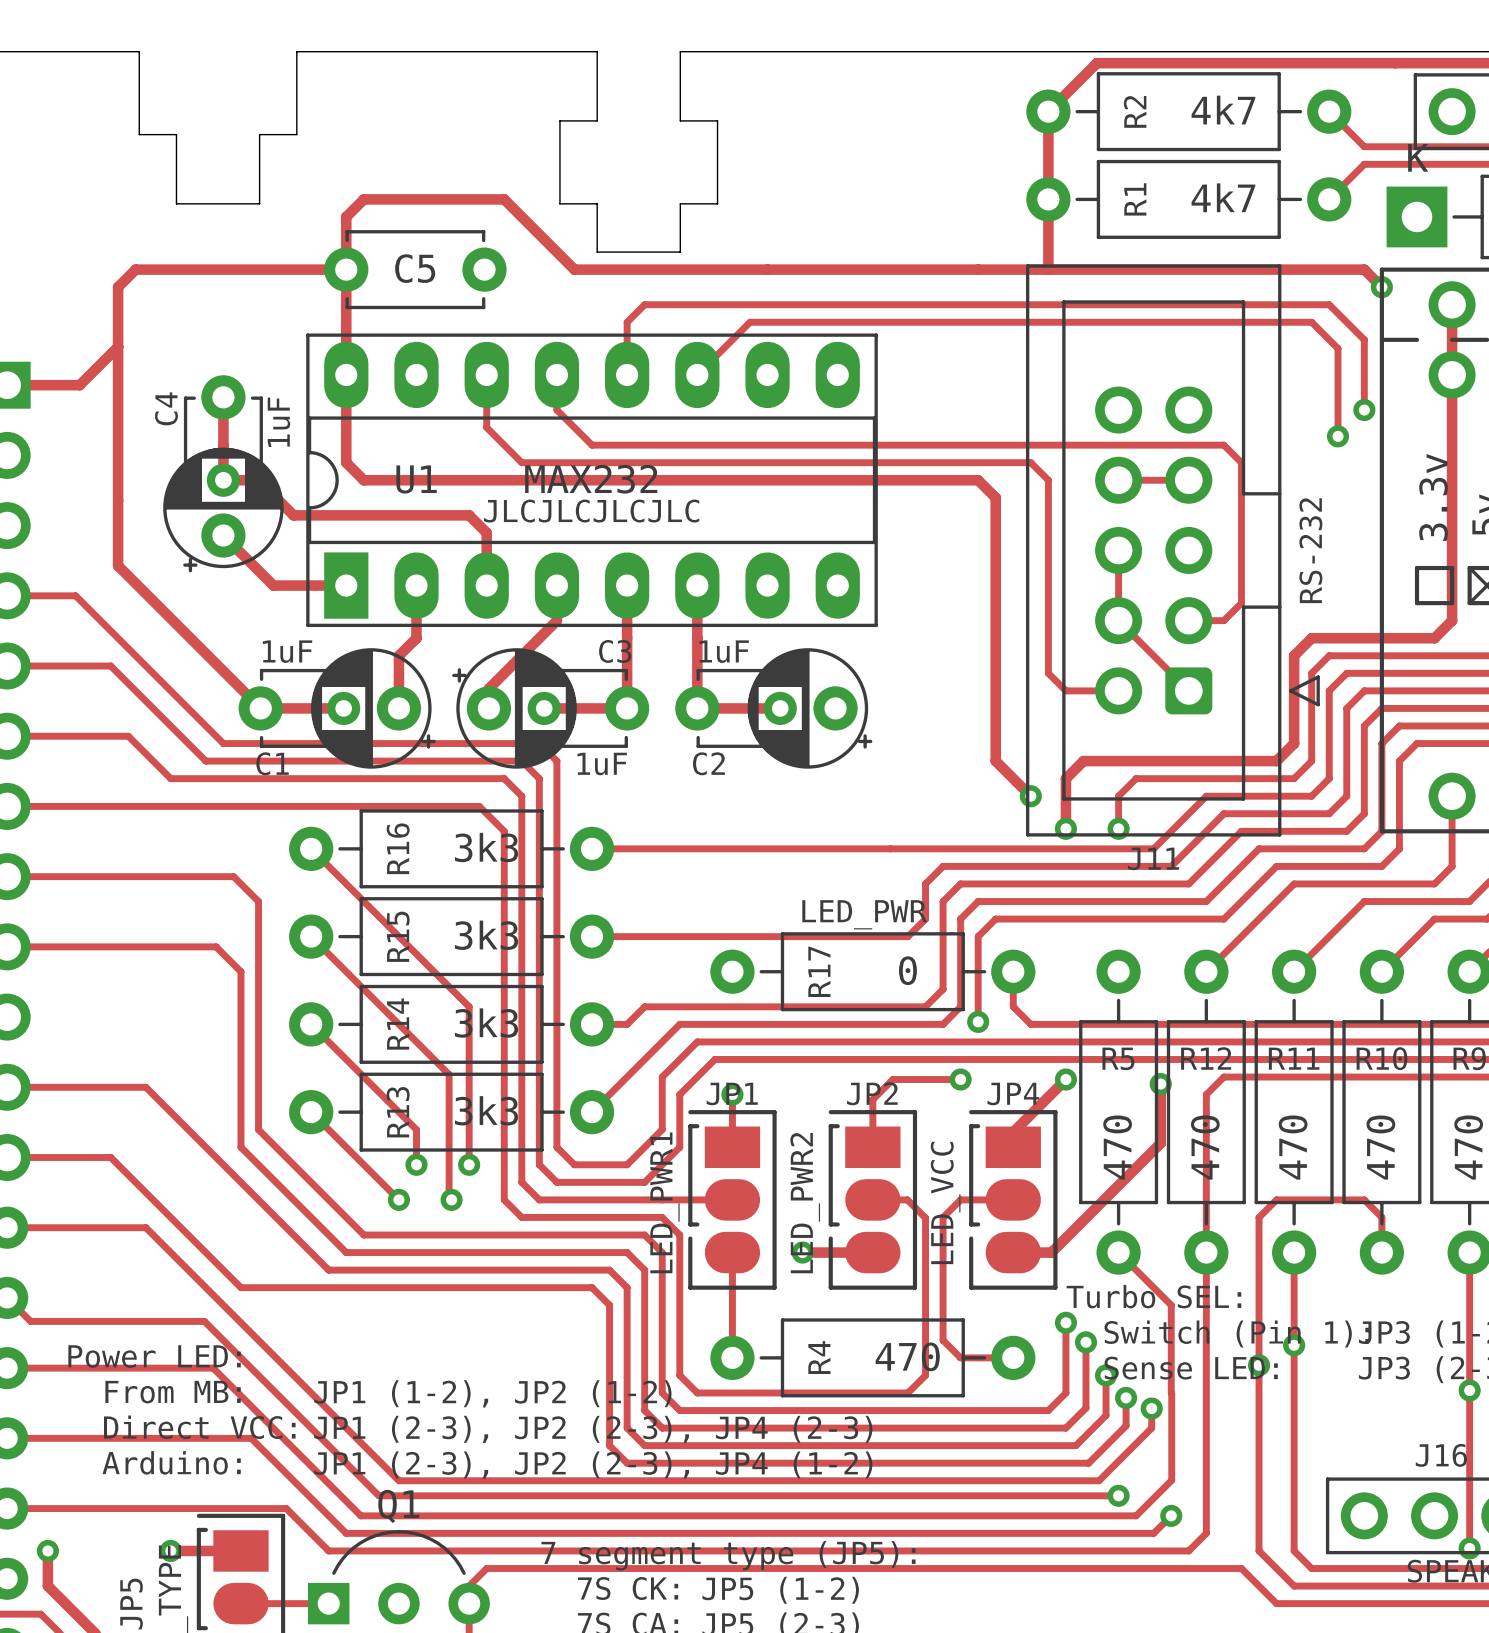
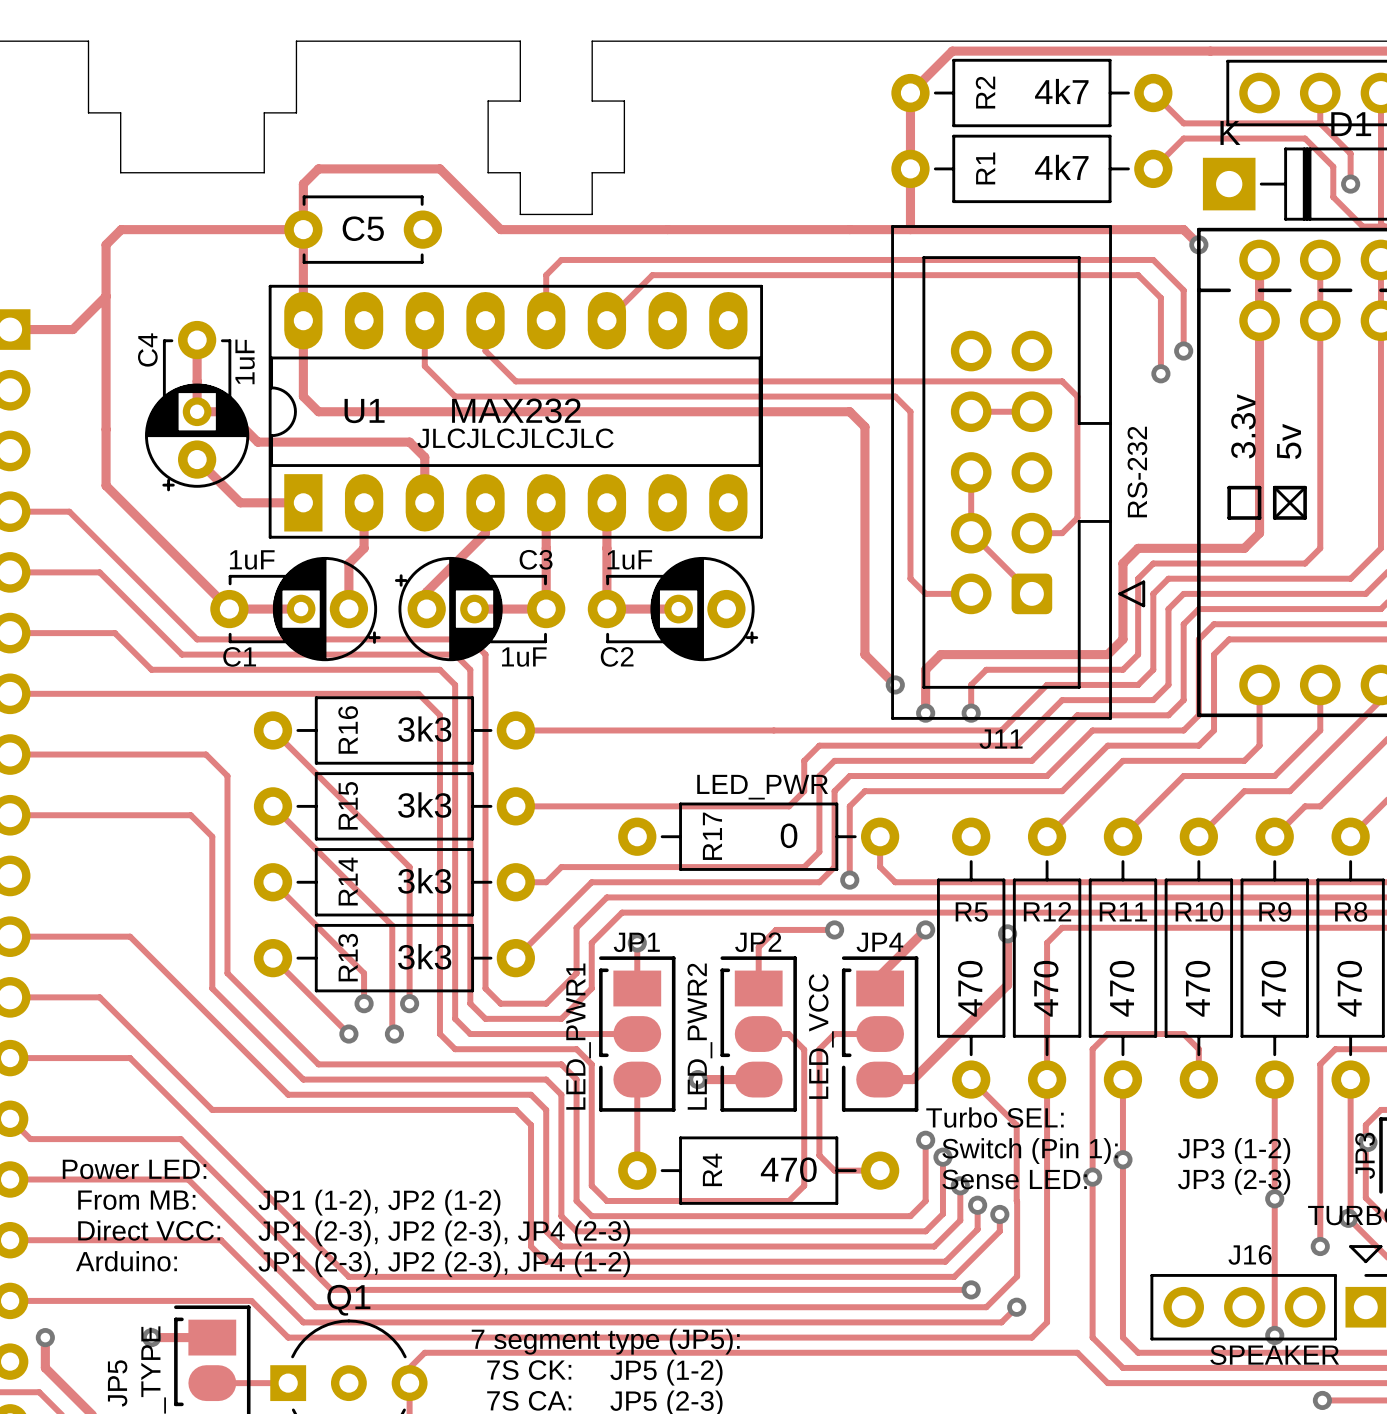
board edge: (97, 51) (139, 51) (139, 134) (176, 134) (176, 203) -> (88, 41) (88, 112) (120, 112) (120, 172) (156, 172)
board edge: (338, 51) (296, 51) (296, 134) (259, 134) (259, 203) -> (296, 41) (296, 112) (264, 112) (264, 172) (228, 172)

